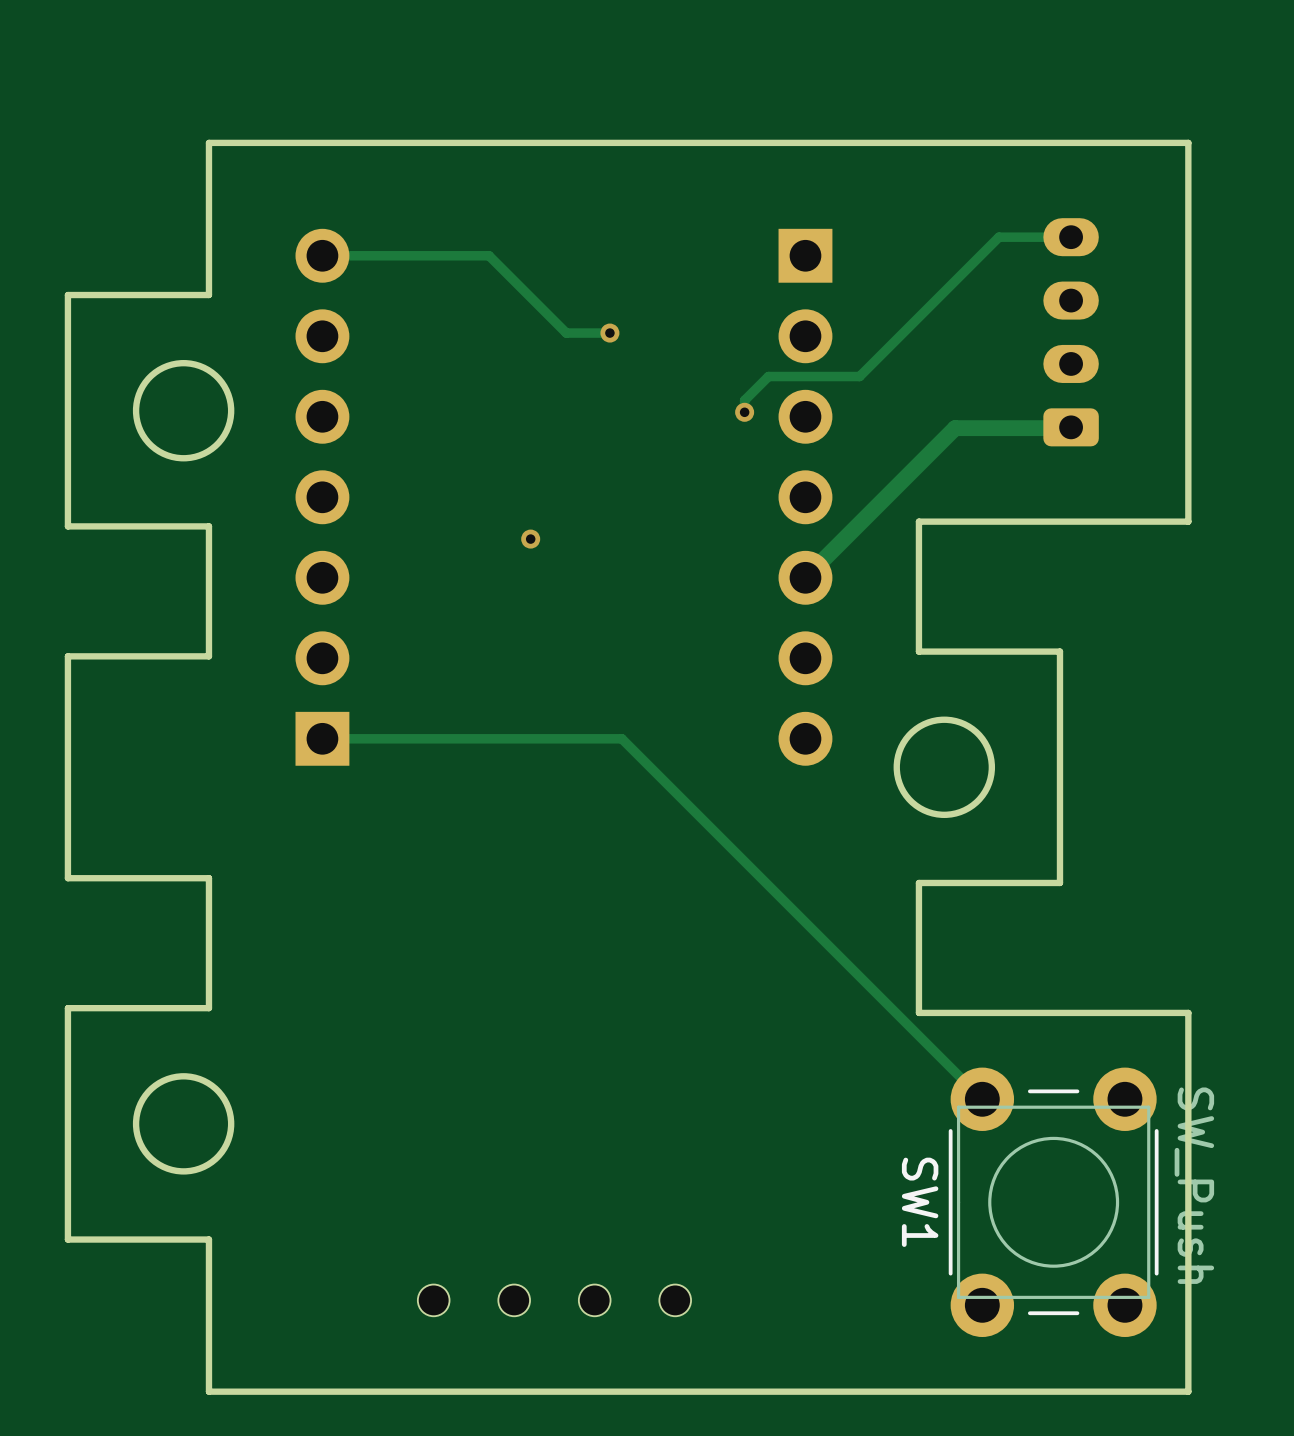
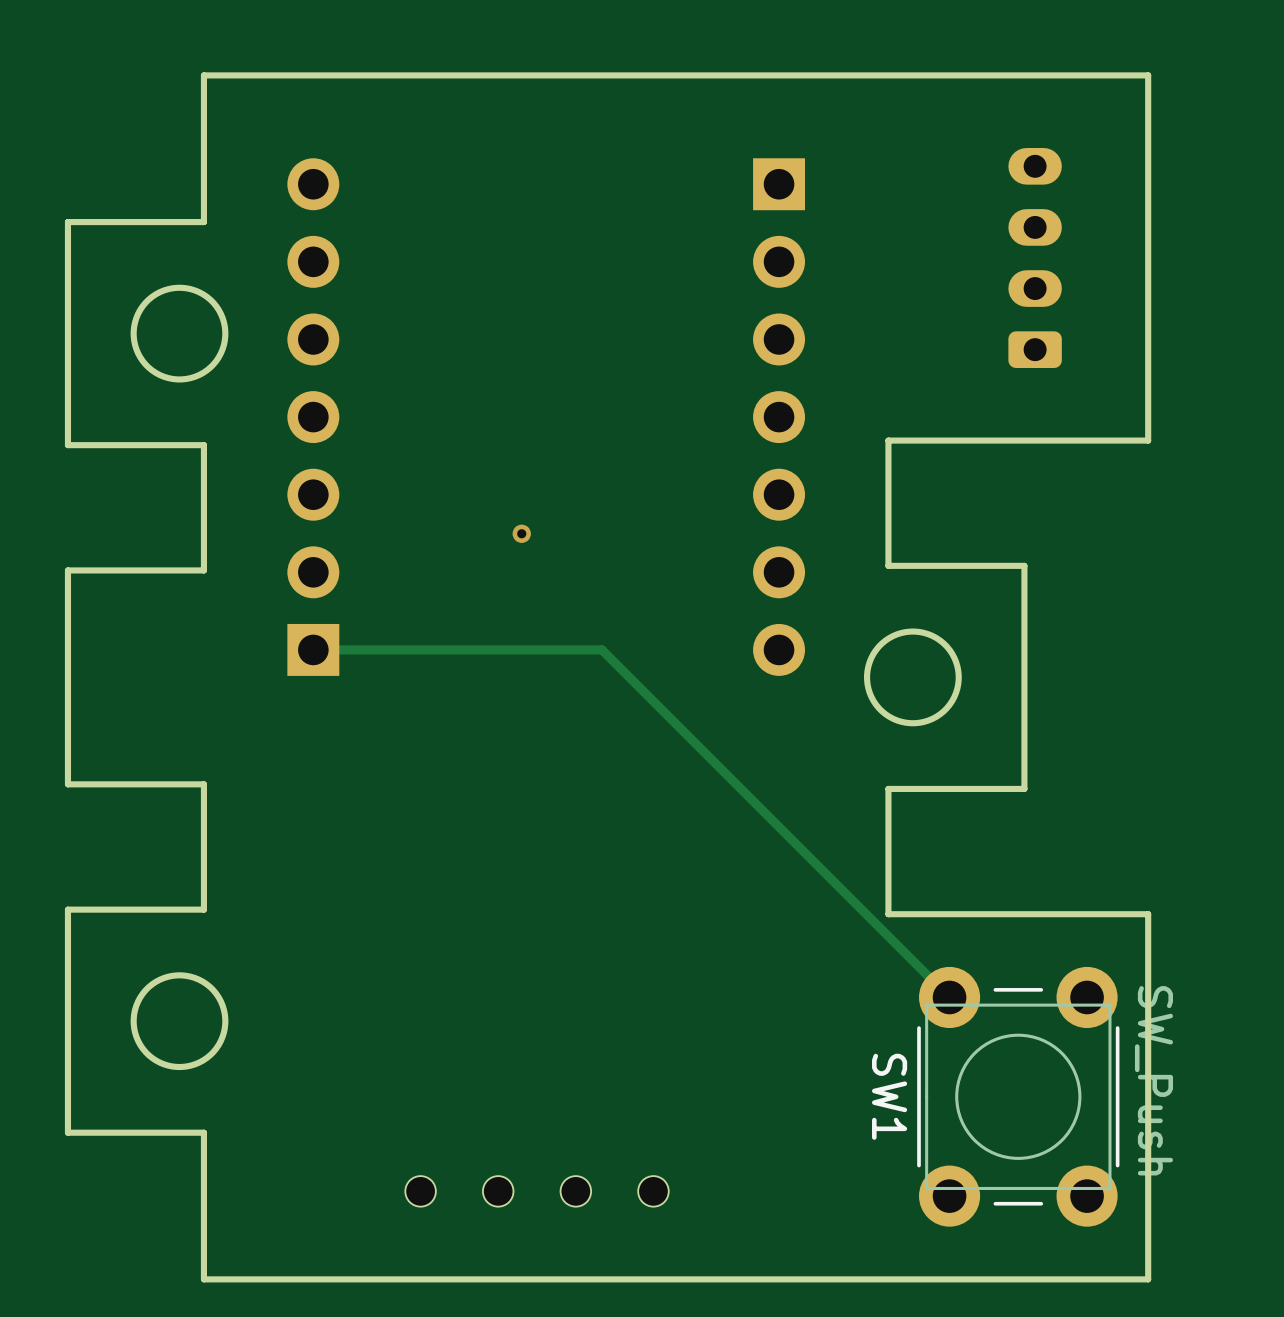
track: (1071, 237) (998, 237) (859, 376) (768, 376) (744, 400) (744, 412) -> none
track: (322, 255) (489, 255) (566, 333) (609, 333) -> none
via: (609, 333) -> none
via: (744, 412) -> none
track: (1071, 427) (955, 428) (805, 577) -> none
via position: (530, 539) -> (521, 533)

